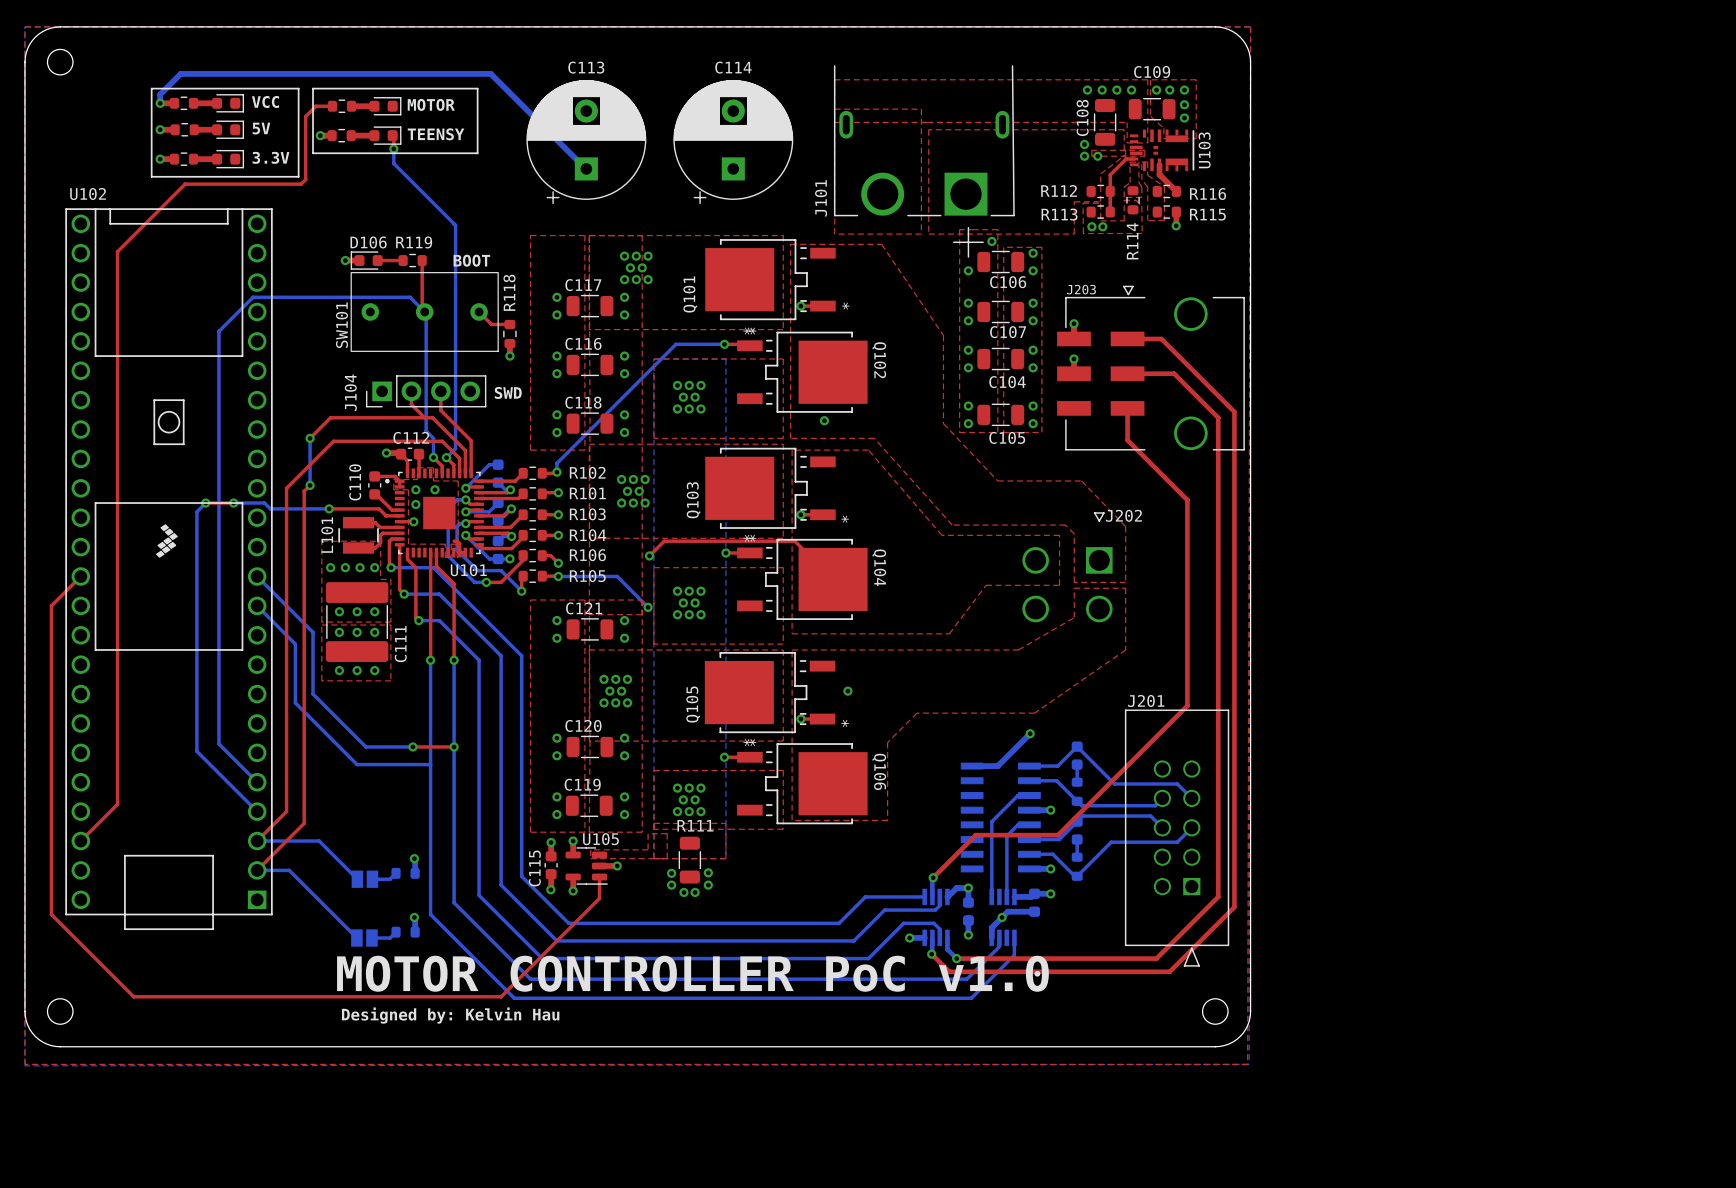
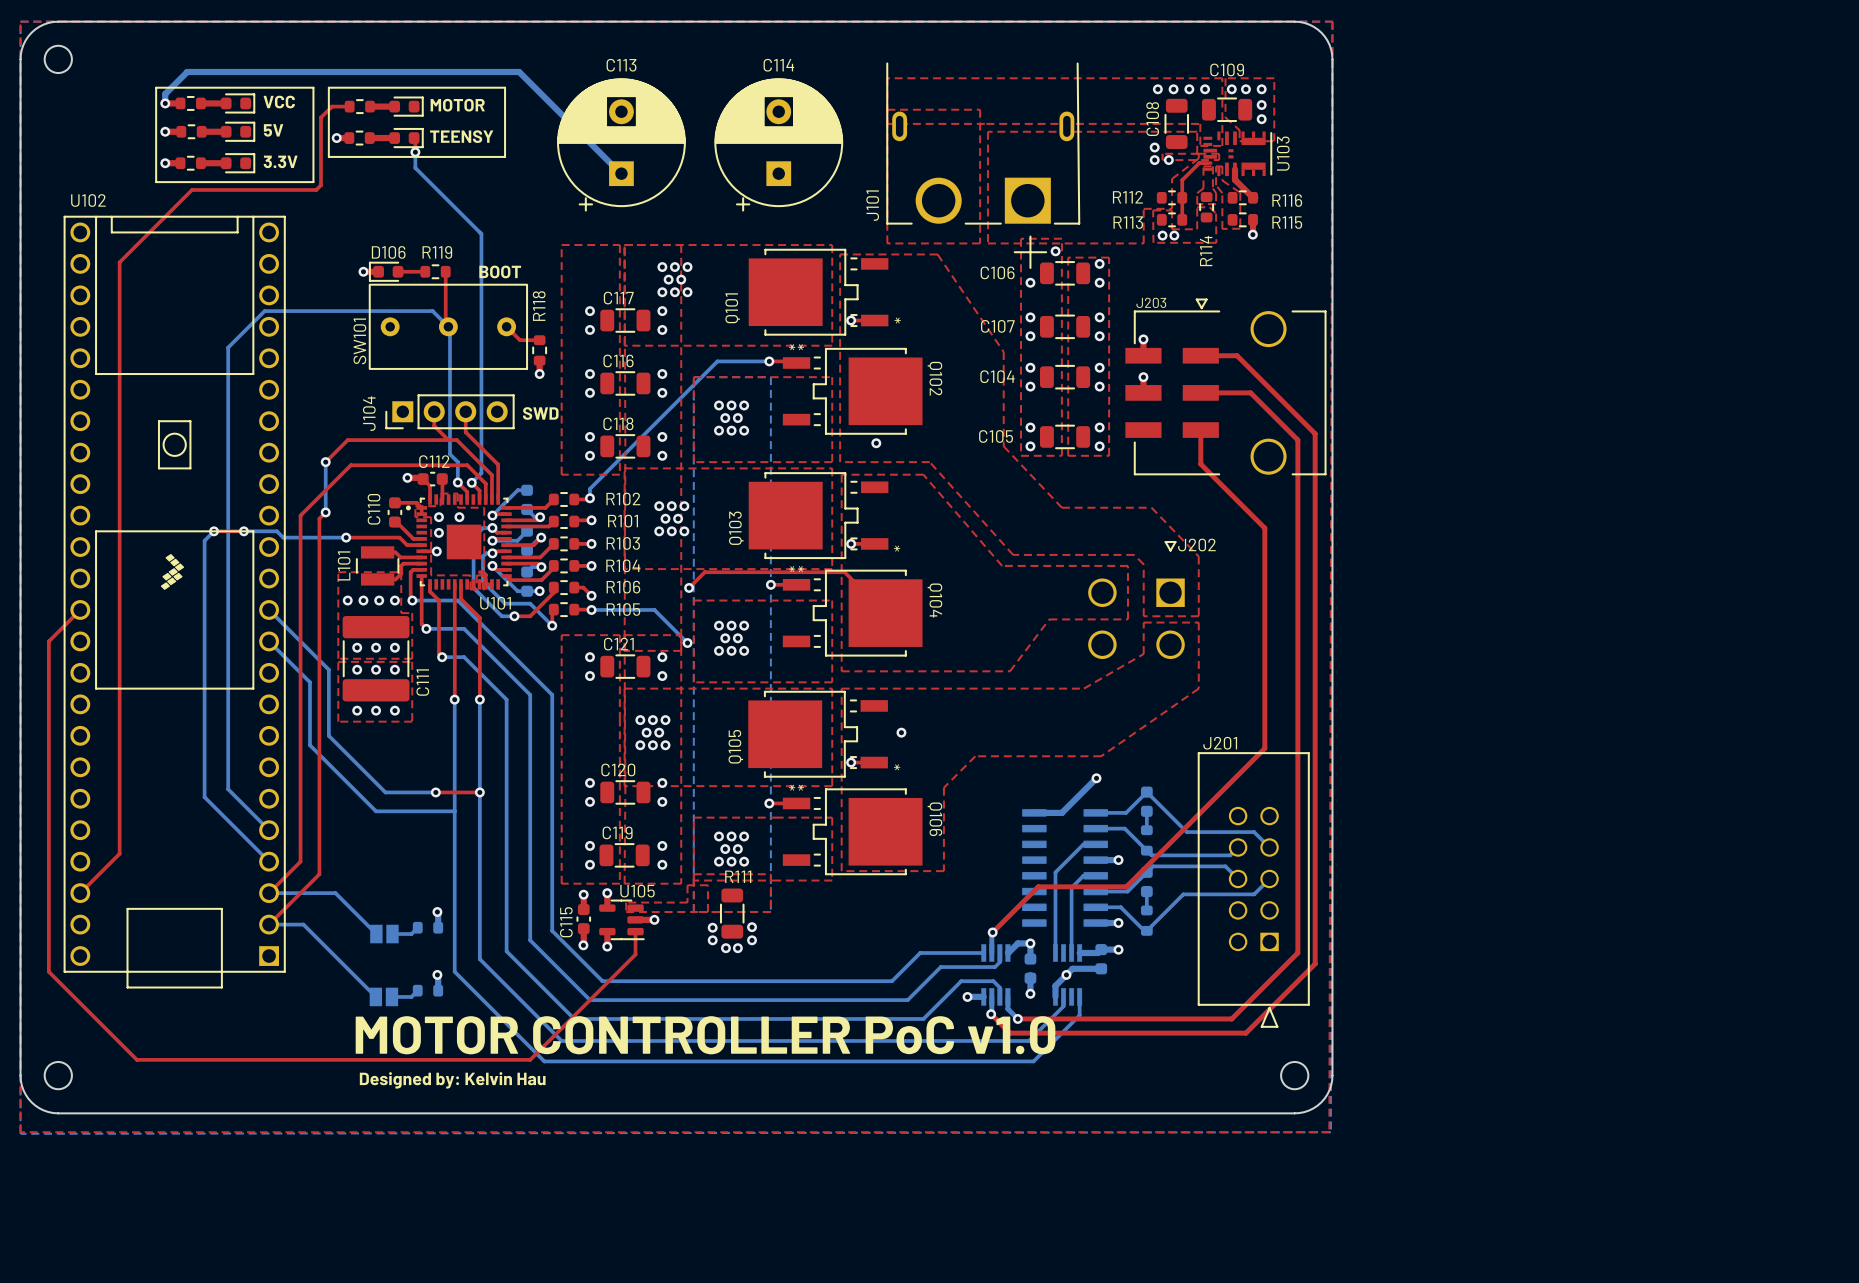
C106 name position: C106 (1008, 282) -> C106 (997, 272)
C107 name position: C107 (1008, 332) -> C107 (997, 326)
C104 name position: C104 (1007, 382) -> C104 (997, 376)
C105 name position: C105 (1007, 437) -> C105 (996, 436)

